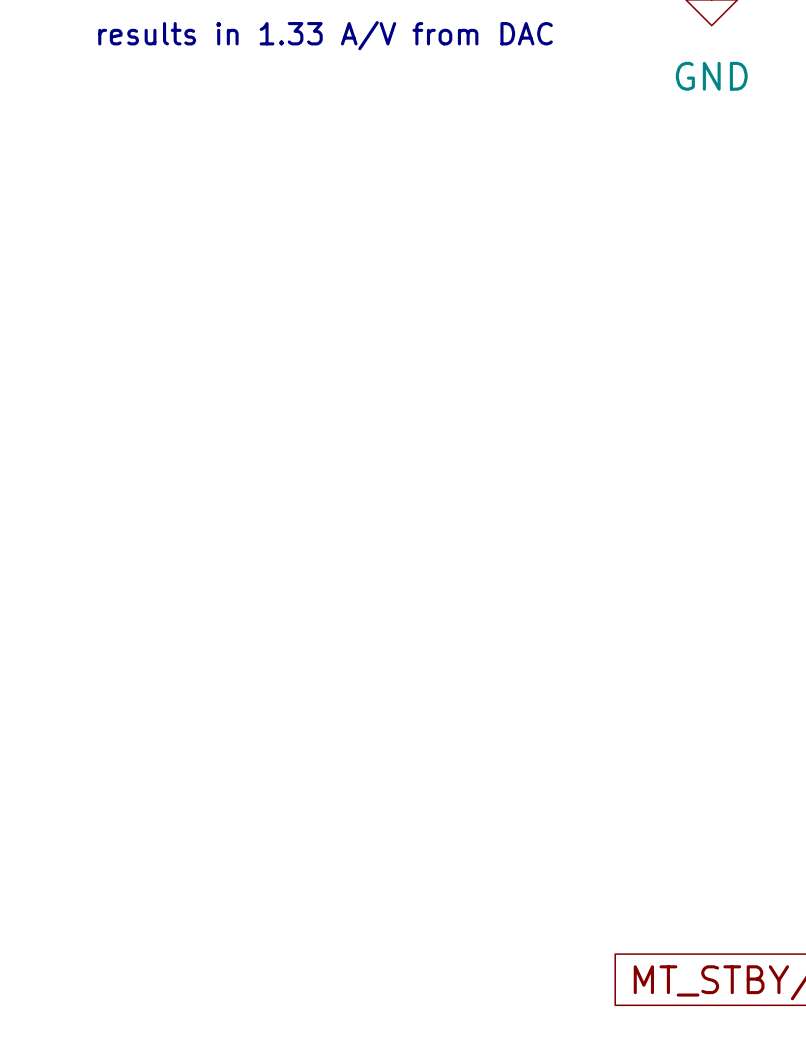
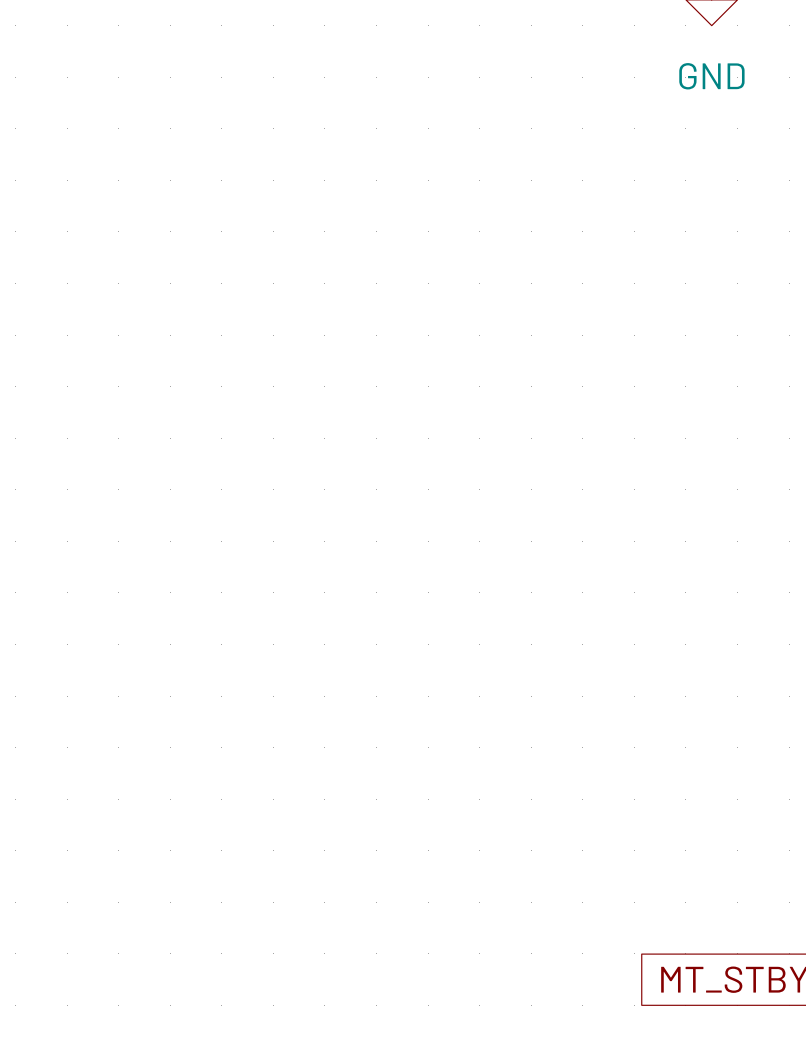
text: results in 1.33 A/V from DAC (325, 35) -> none

